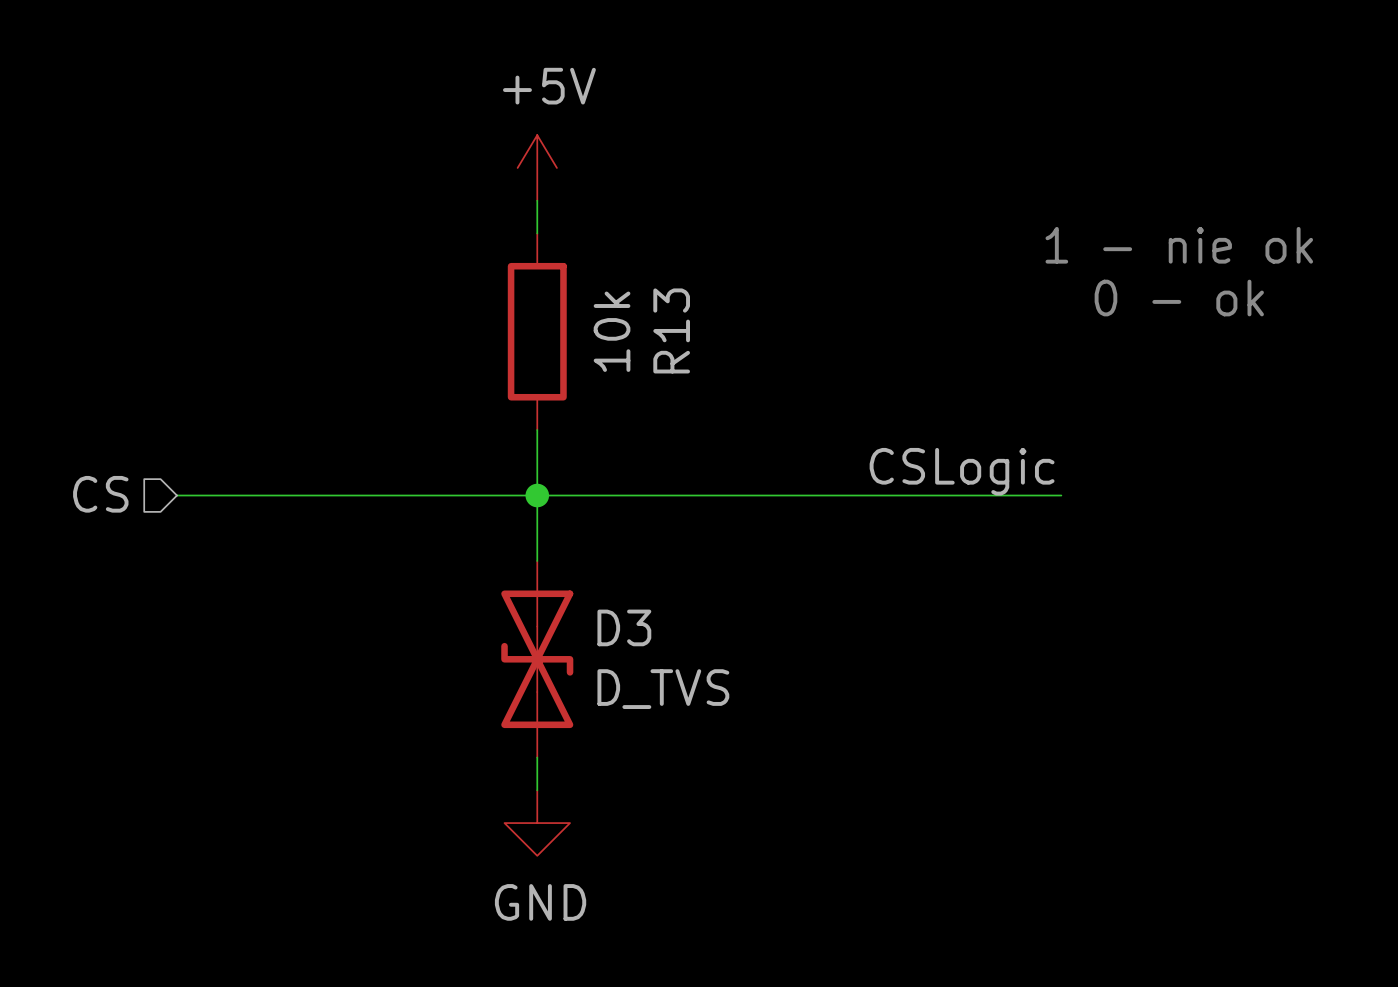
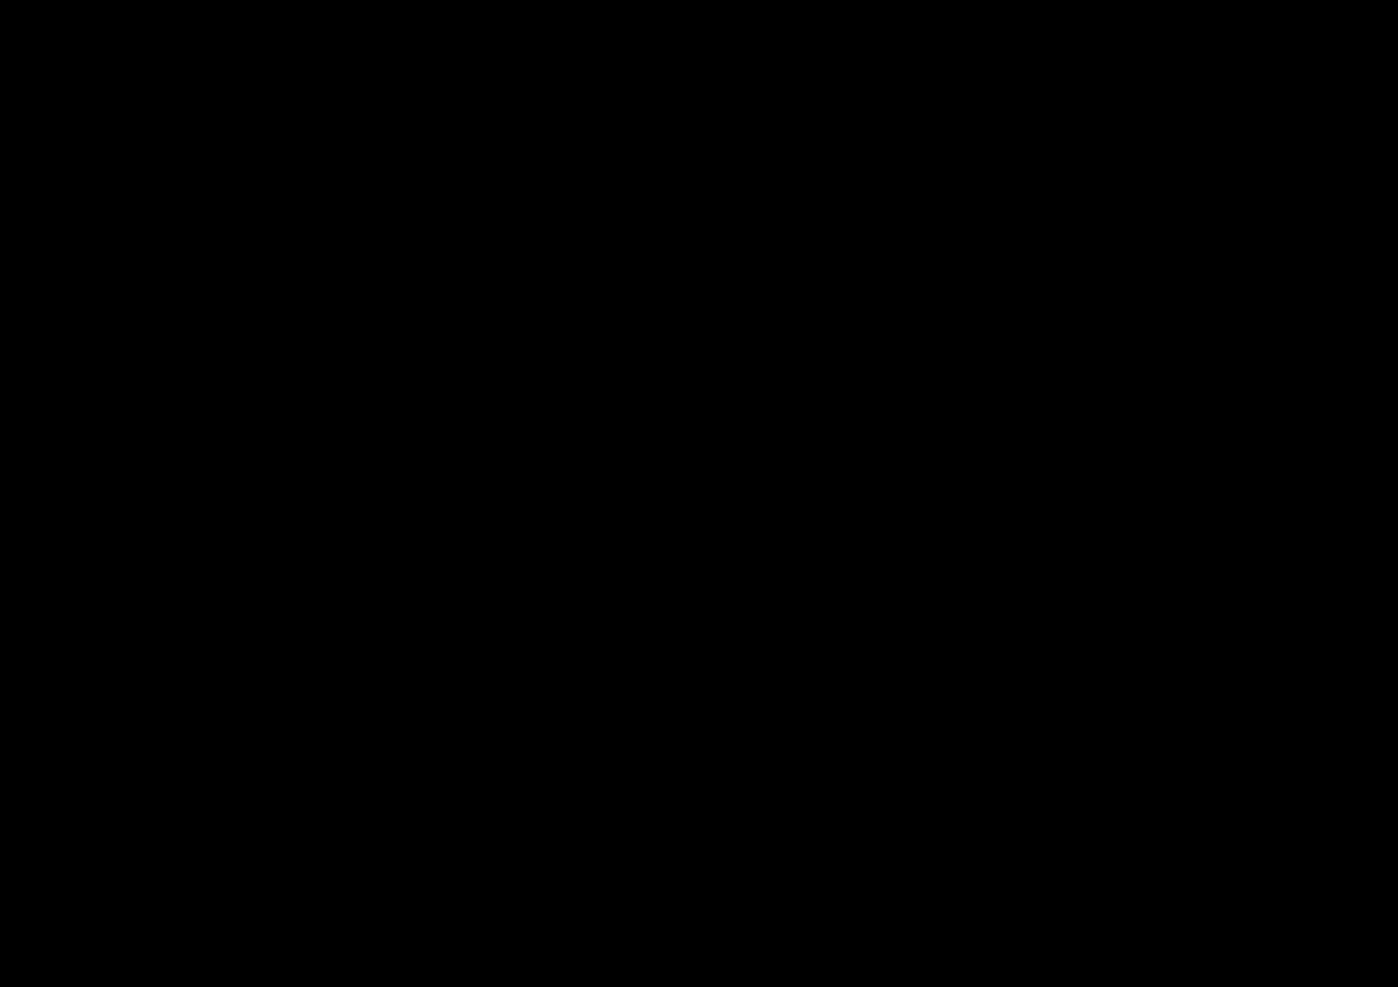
power symbol: +5V (537, 167) -> none
wire: (537, 200) (537, 233) -> none
text: 1 - nie ok (1179, 245) -> none
text: 0 - ok (1179, 298) -> none
R13: 10k (537, 331) -> none
wire: (537, 430) (537, 561) -> none
label: CSLogic (962, 471) -> none
hierarchical label: CS (100, 494) -> none
wire: (176, 495) (1061, 495) -> none
junction: (537, 495) -> none
D3: D_TVS (537, 659) -> none
wire: (537, 757) (537, 790) -> none
power symbol: GND (537, 823) -> none

